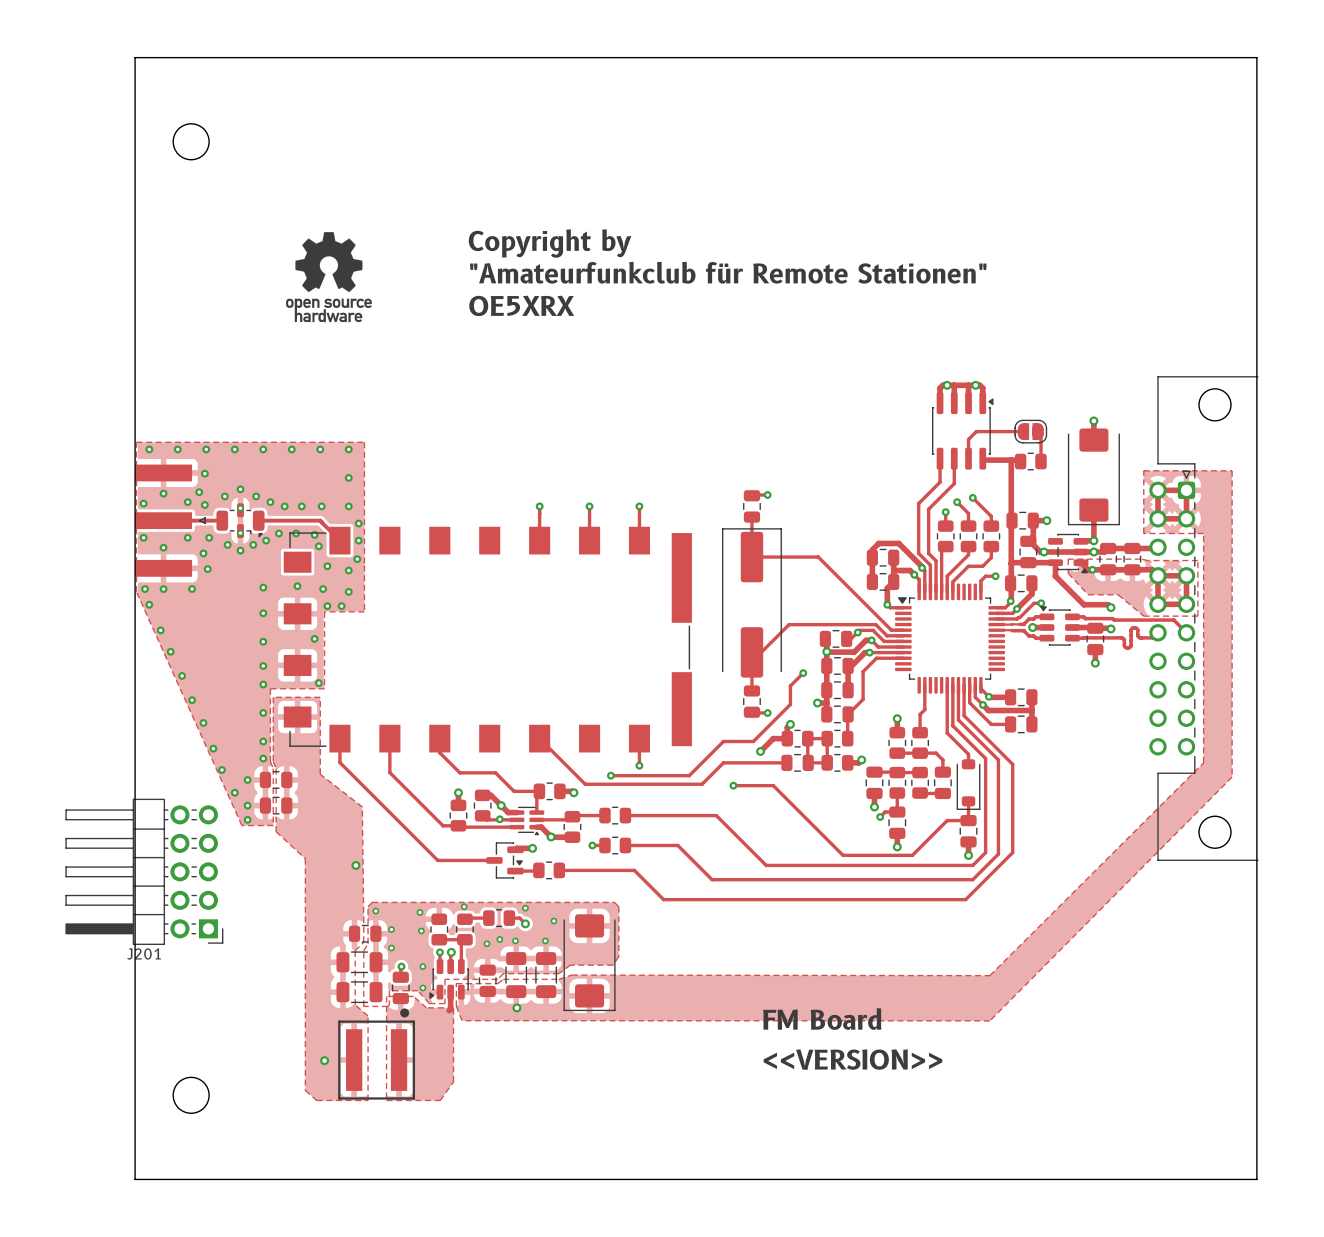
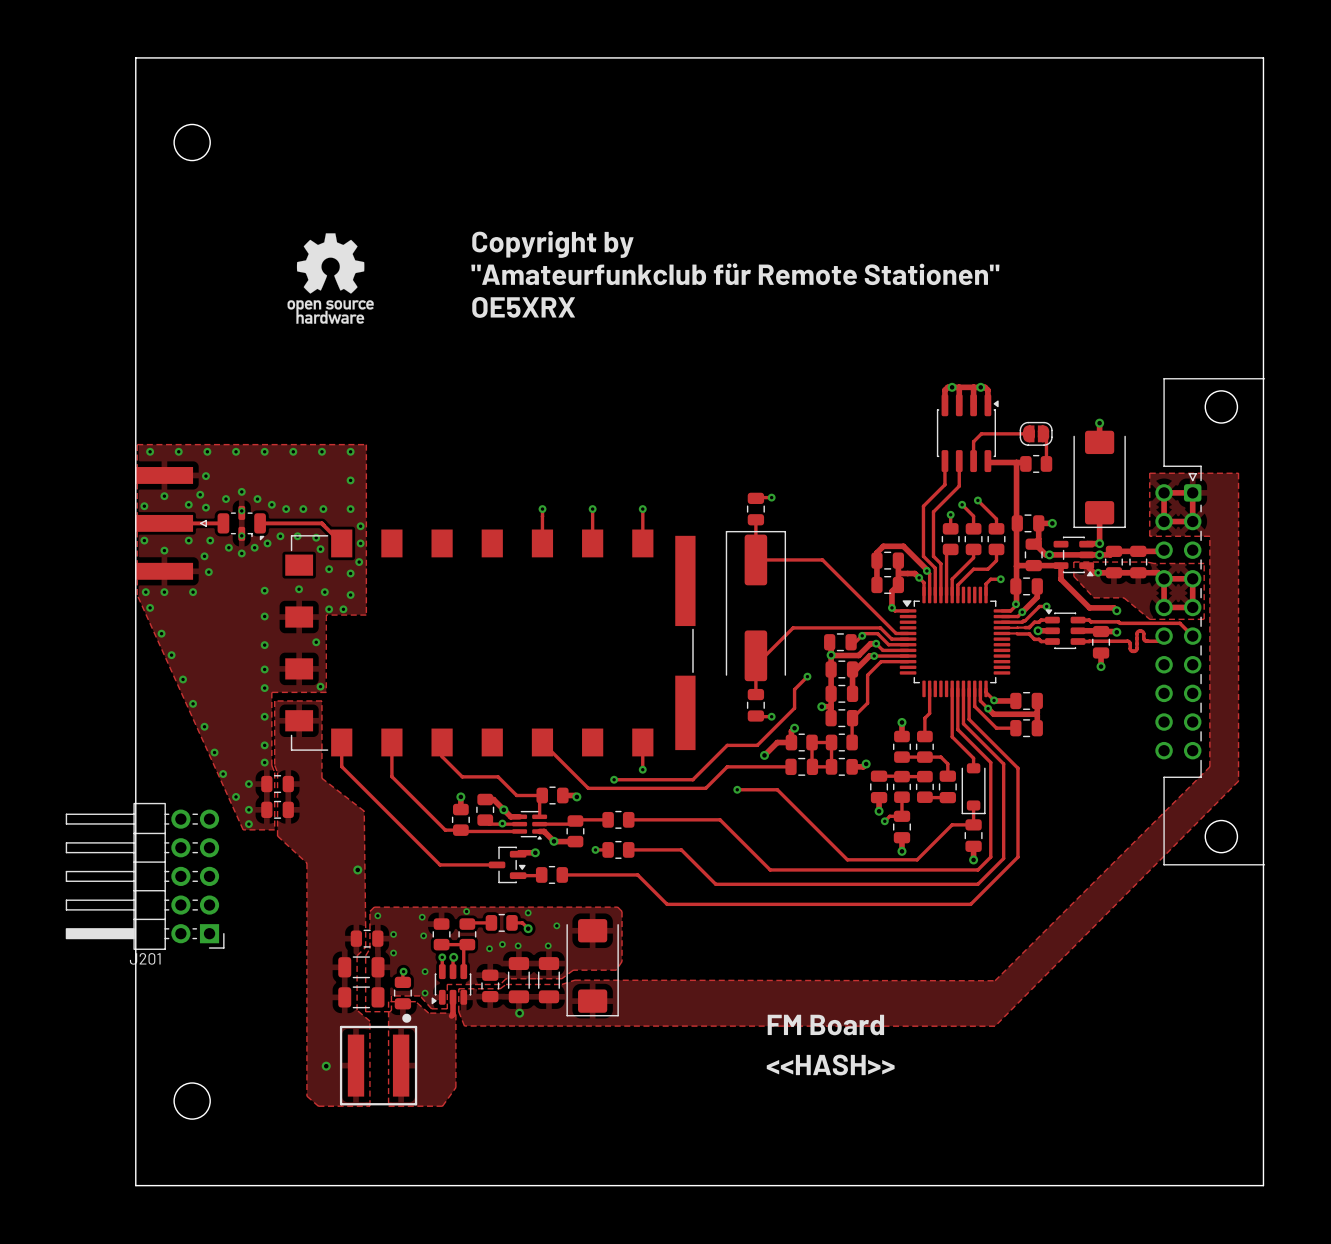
text: <<VERSION>> (852, 1059) -> <<HASH>> (830, 1065)

